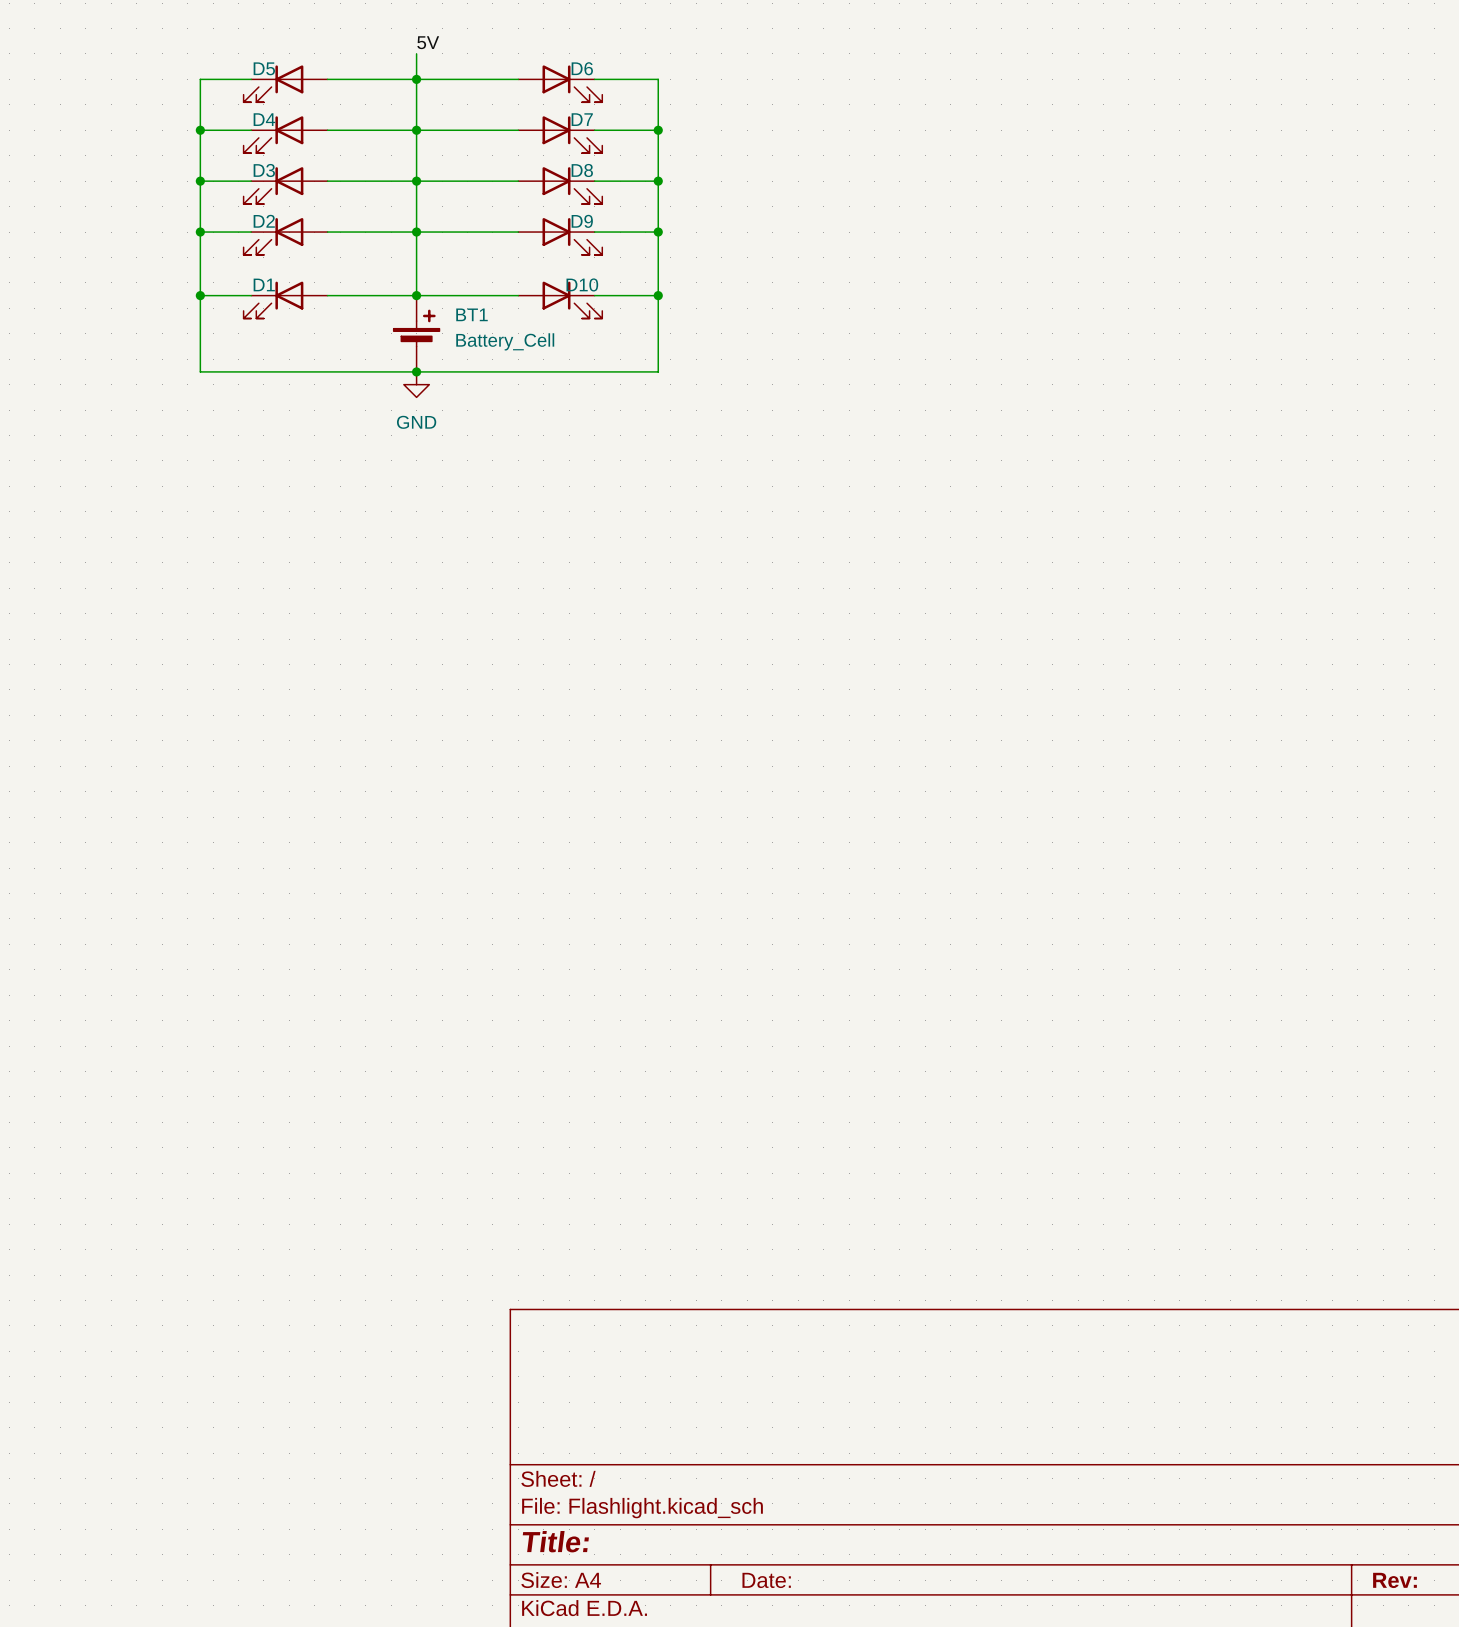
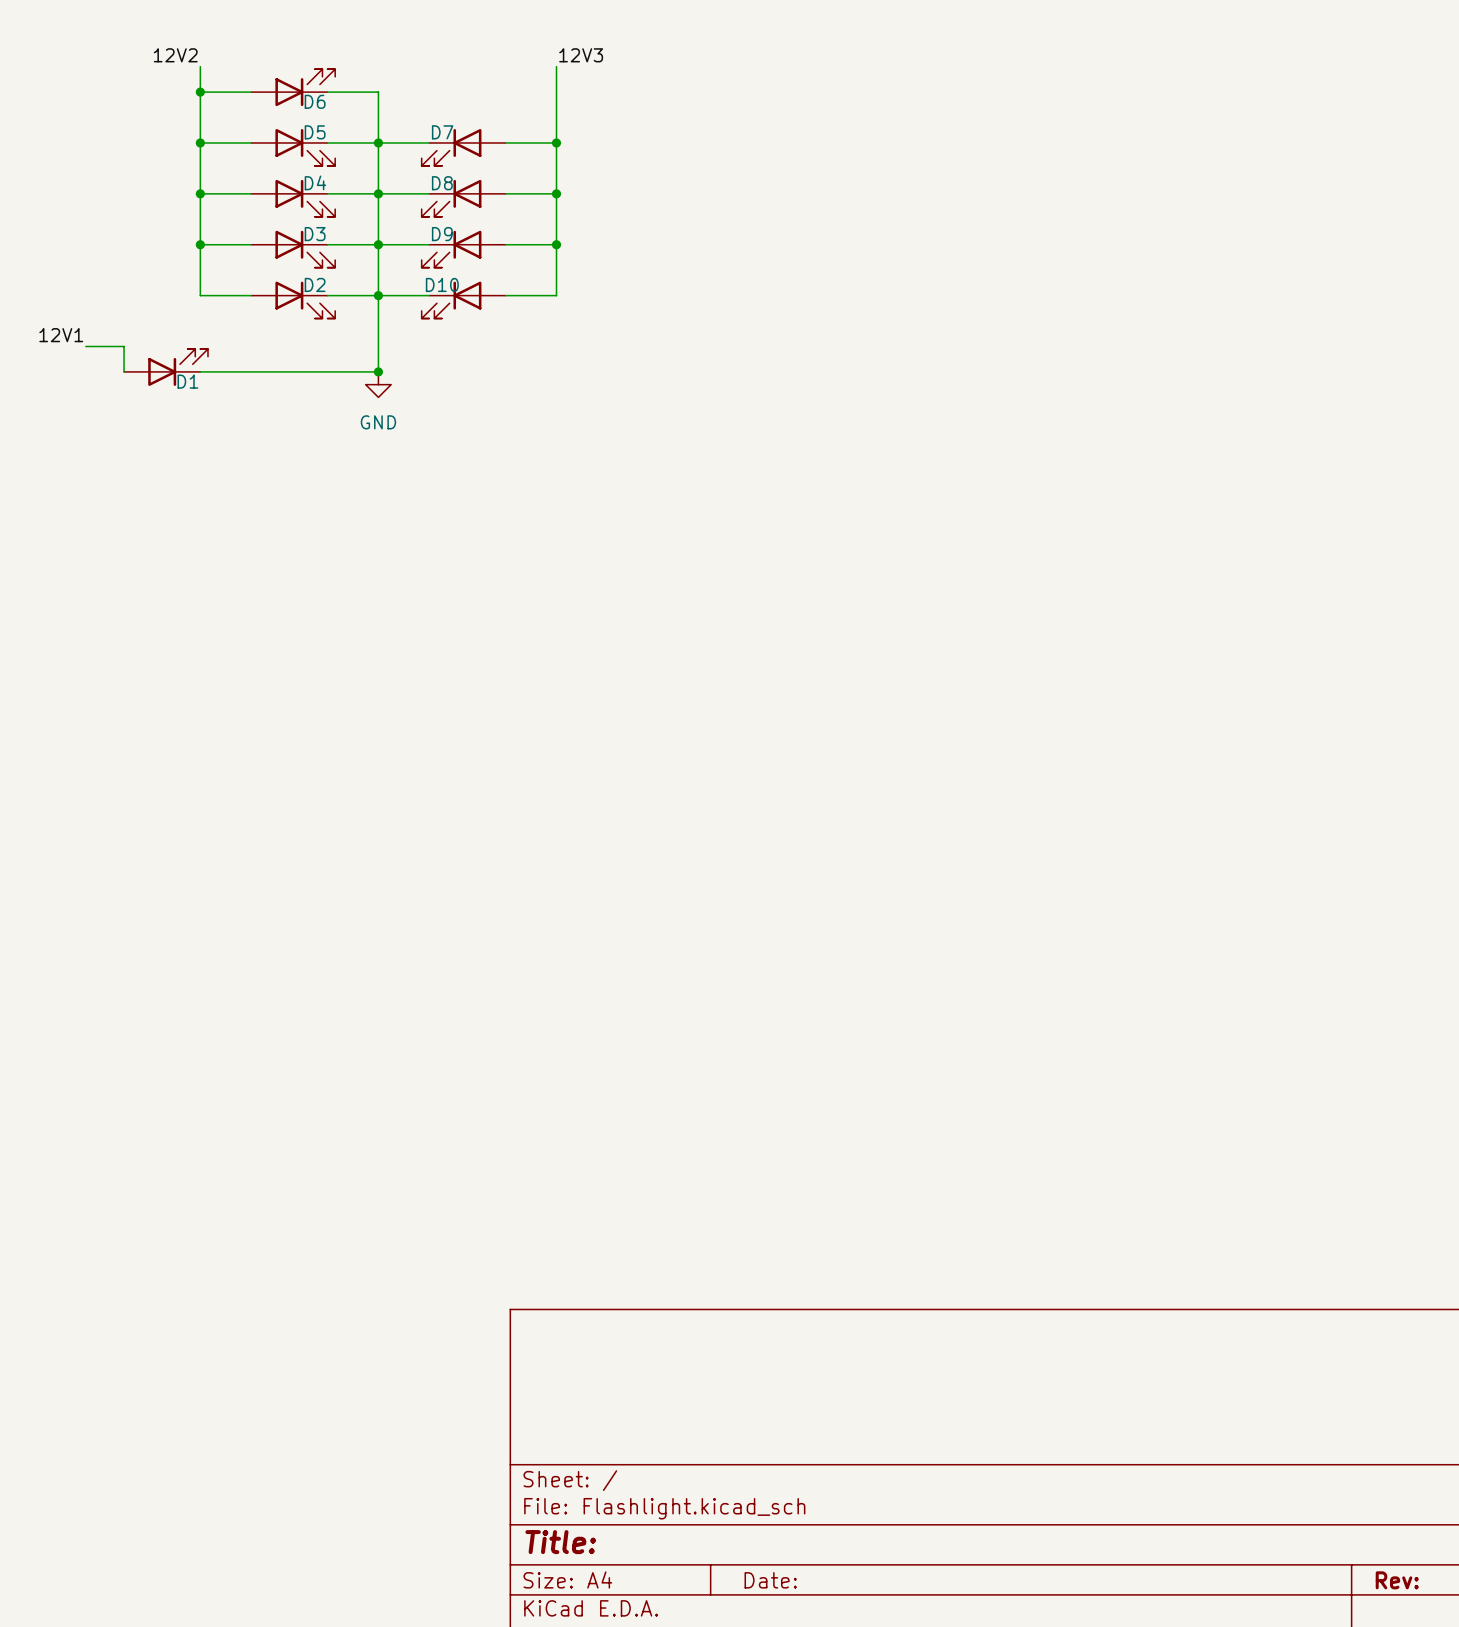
label: 5V (428, 42) -> none
wire: (416, 53) (416, 295) -> none
label: none -> 12V2 (175, 55)
label: none -> 12V3 (581, 55)
wire: none -> (556, 66) (556, 295) (518, 295)
wire: (200, 79) (251, 79) -> (200, 79) (200, 66)
wire: (327, 79) (518, 79) -> none
junction: (416, 79) -> none
wire: (594, 79) (658, 79) (658, 371) (378, 371) -> (327, 92) (378, 92) (378, 371)
D5 flip: as is (273, 83) -> left-right (305, 147)
D5 position: (285, 83) -> (293, 147)
D6 position: (560, 83) -> (293, 87)
D6 flip: as is (572, 83) -> up-down (305, 87)
wire: none -> (200, 92) (251, 92)
junction: none -> (200, 92)
wire: (200, 130) (251, 130) -> (200, 142) (251, 142)
junction position: (200, 130) -> (200, 142)
wire: (327, 130) (518, 130) -> none
junction: (416, 130) -> none
wire: (594, 130) (658, 130) -> none
junction: (658, 130) -> none
D4 flip: as is (273, 134) -> left-right (305, 198)
D4 position: (285, 134) -> (293, 198)
D7 position: (560, 134) -> (463, 147)
D7 flip: as is (572, 134) -> left-right (451, 147)
wire: none -> (327, 142) (429, 142)
junction: none -> (378, 142)
wire: none -> (505, 142) (556, 142)
junction: none -> (556, 142)
wire: (200, 181) (251, 181) -> (200, 193) (251, 193)
junction position: (200, 181) -> (200, 193)
wire: (327, 181) (518, 181) -> none
junction: (416, 181) -> none
wire: (594, 181) (658, 181) -> none
junction: (658, 181) -> none
D3 flip: as is (273, 185) -> left-right (305, 249)
D3 position: (285, 185) -> (293, 249)
D8 position: (560, 185) -> (463, 198)
D8 flip: as is (572, 185) -> left-right (451, 198)
wire: none -> (327, 193) (429, 193)
junction: none -> (378, 193)
wire: none -> (505, 193) (556, 193)
junction: none -> (556, 193)
wire: (200, 232) (251, 232) -> (200, 244) (251, 244)
junction position: (200, 232) -> (200, 244)
wire: (327, 232) (518, 232) -> none
junction: (416, 232) -> none
wire: (594, 232) (658, 232) -> none
junction: (658, 232) -> none
D2 flip: as is (273, 236) -> left-right (305, 300)
D2 position: (285, 236) -> (293, 300)
D9 position: (560, 236) -> (463, 249)
D9 flip: as is (572, 236) -> left-right (451, 249)
wire: none -> (327, 244) (429, 244)
junction: none -> (378, 244)
wire: none -> (505, 244) (556, 244)
junction: none -> (556, 244)
wire: (200, 295) (200, 371) -> none
junction: (200, 295) -> none
junction: none -> (378, 295)
junction: (416, 295) -> none
wire: (594, 295) (658, 295) -> none
junction: (658, 295) -> none
D1 rotation: 0° (273, 300) -> 180° (178, 367)
D1 position: (285, 300) -> (166, 367)
D10 position: (560, 300) -> (463, 300)
D10 flip: as is (572, 300) -> left-right (451, 300)
BT1: Battery_Cell (416, 333) -> none
label: none -> 12V1 (61, 335)
wire: none -> (85, 346) (124, 346) (124, 371)
junction position: (416, 371) -> (378, 371)
power symbol position: GND (416, 384) -> GND (378, 384)

